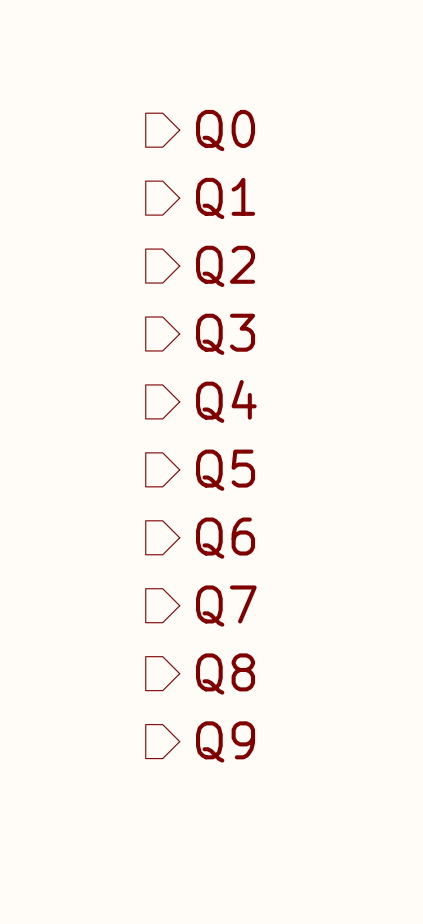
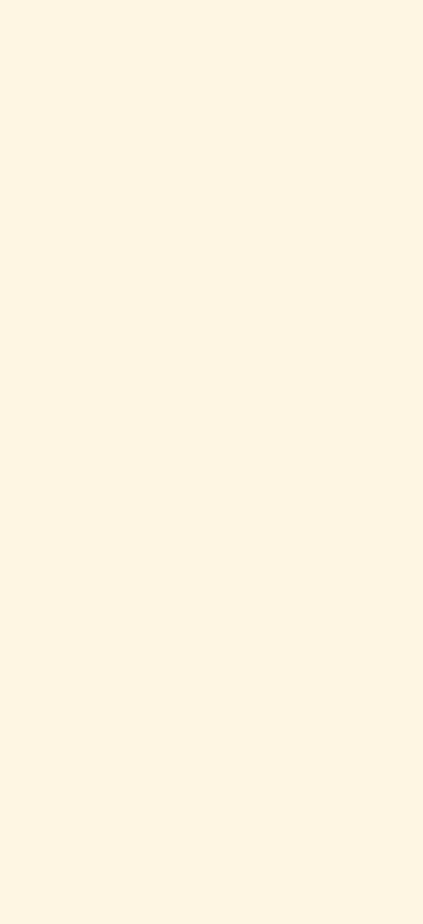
hierarchical label: Q0 (225, 130) -> none
hierarchical label: Q1 (225, 198) -> none
hierarchical label: Q2 (225, 266) -> none
hierarchical label: Q3 (225, 334) -> none
hierarchical label: Q4 (226, 401) -> none
hierarchical label: Q5 (225, 470) -> none
hierarchical label: Q6 (225, 538) -> none
hierarchical label: Q7 (226, 606) -> none
hierarchical label: Q8 (225, 674) -> none
hierarchical label: Q9 (225, 741) -> none

